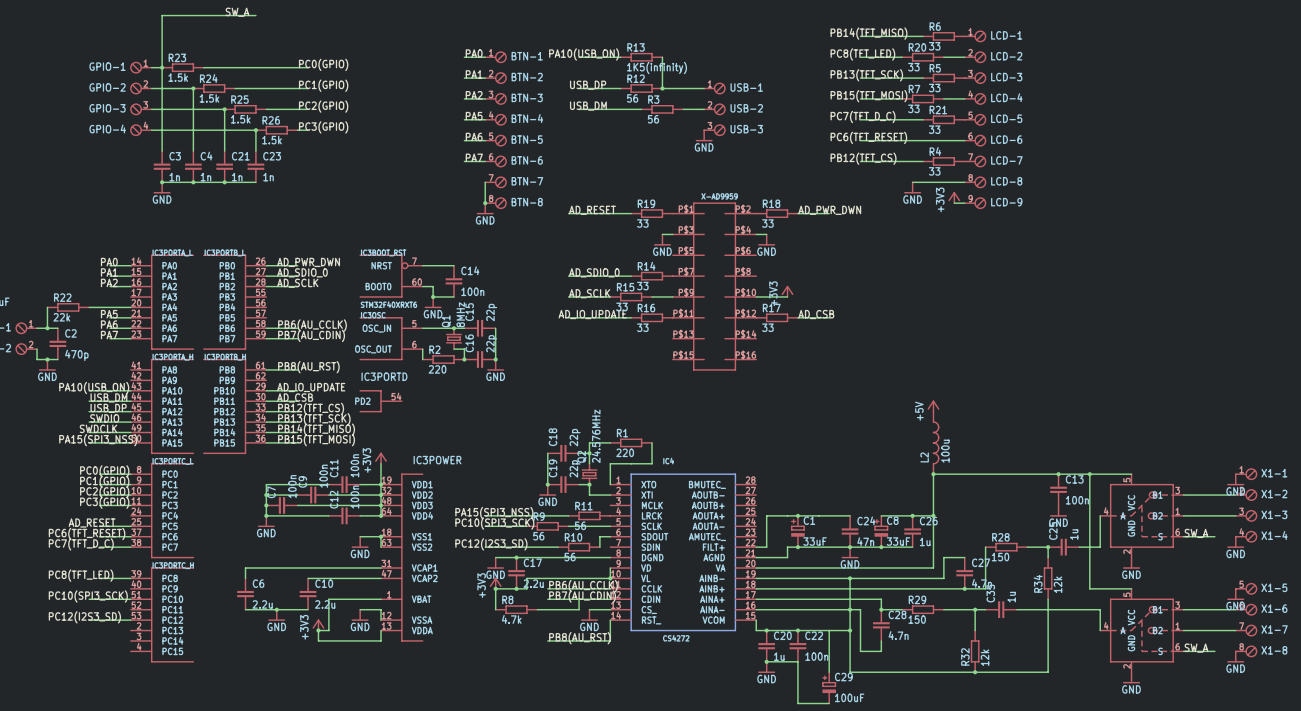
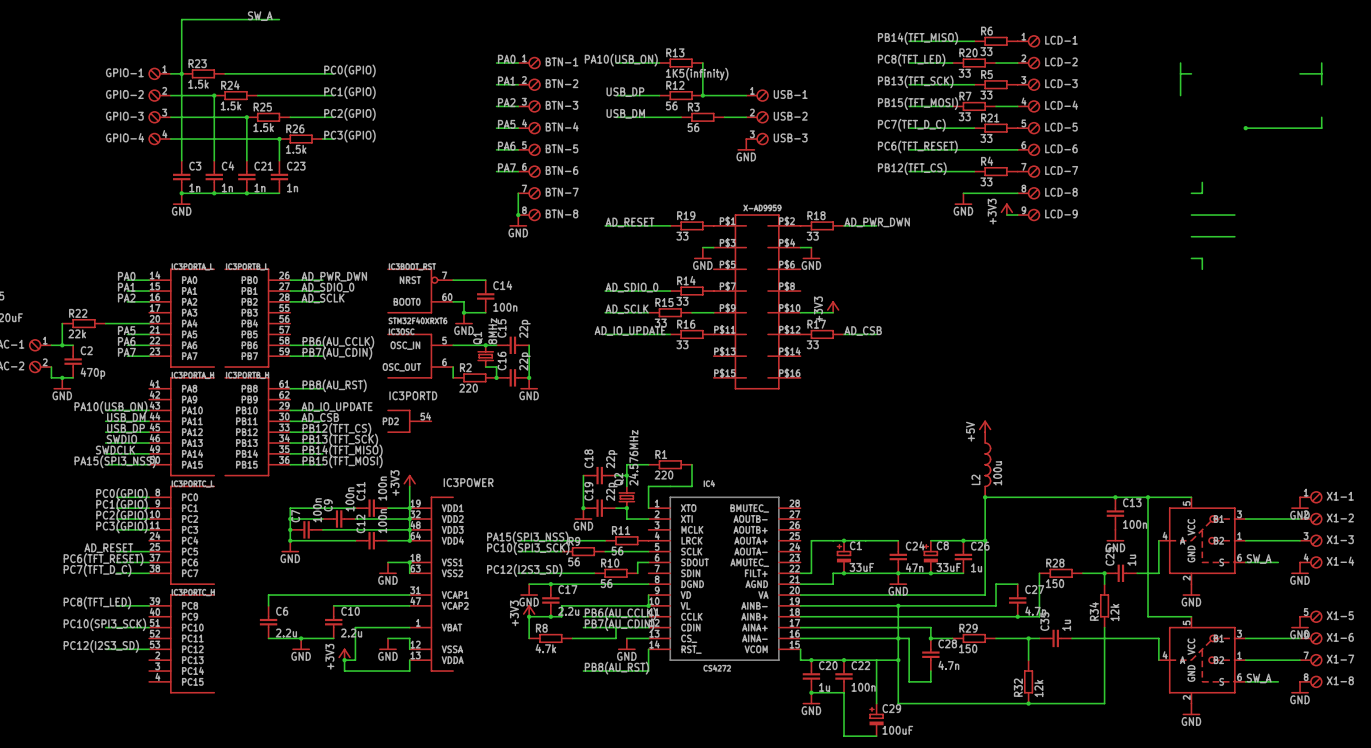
wire: none -> (1180, 63) (1180, 95)
wire: none -> (1321, 63) (1321, 84)
wire: none -> (1180, 73) (1191, 73)
wire: none -> (1300, 73) (1321, 73)
wire: none -> (1321, 117) (1321, 128) (1245, 128)
junction: none -> (1245, 128)
wire: none -> (1202, 182) (1202, 193) (1191, 193)
wire: none -> (1191, 215) (1234, 215)
wire: none -> (1191, 236) (1234, 236)
wire: none -> (1191, 258) (1202, 258) (1202, 269)

